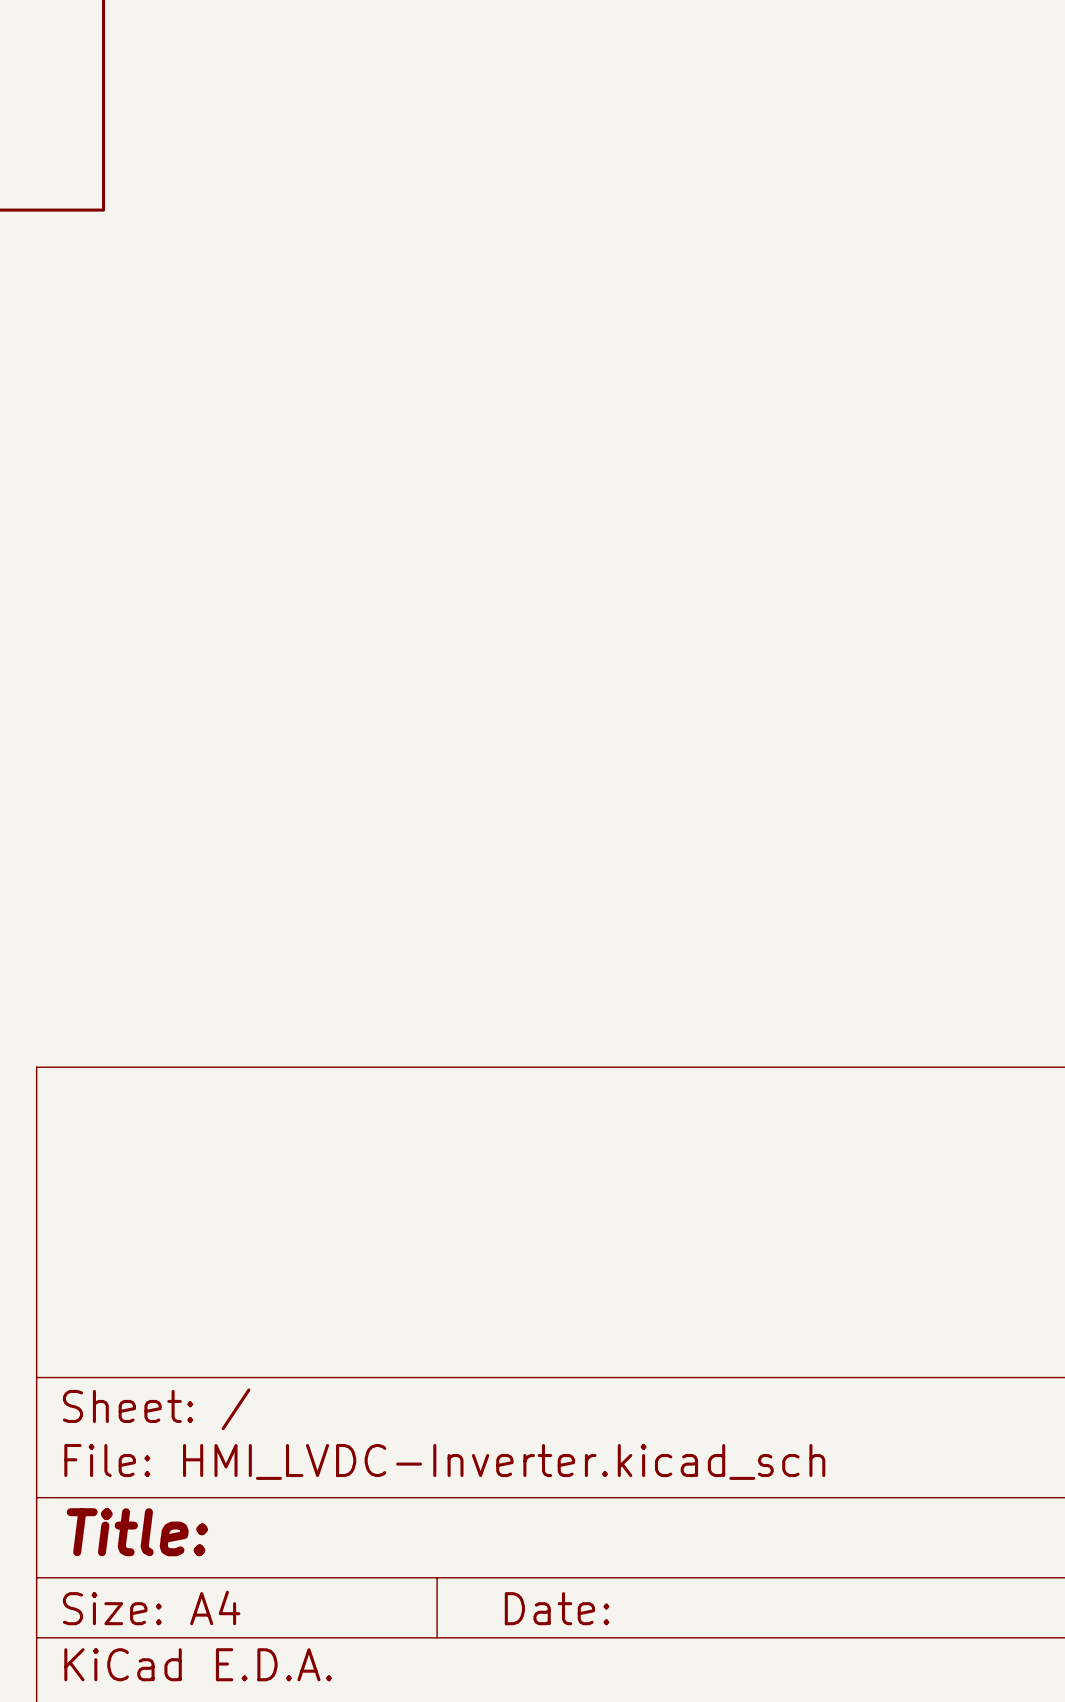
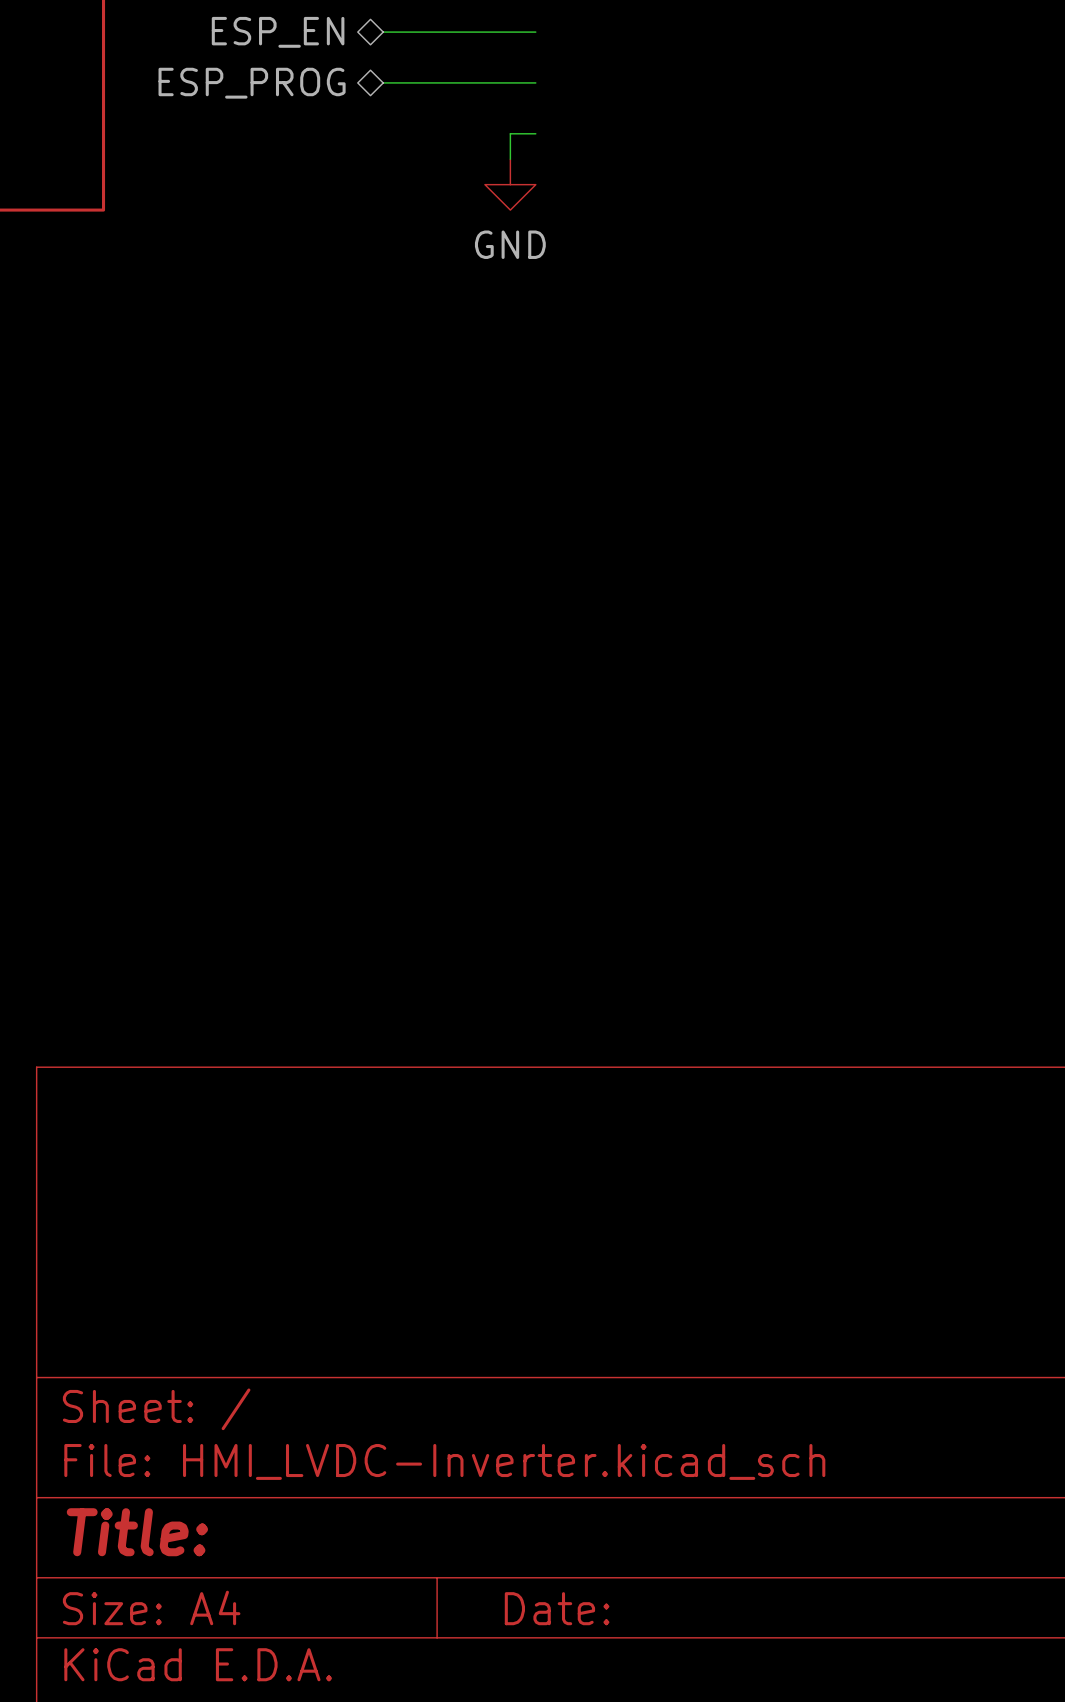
sheet pin: none -> ESP_EN (278, 32)
wire: none -> (383, 32) (535, 32)
wire: none -> (383, 82) (535, 82)
sheet pin: none -> ESP_PROG (252, 83)
wire: none -> (535, 133) (510, 133) (510, 159)
power symbol: none -> GND (510, 184)

